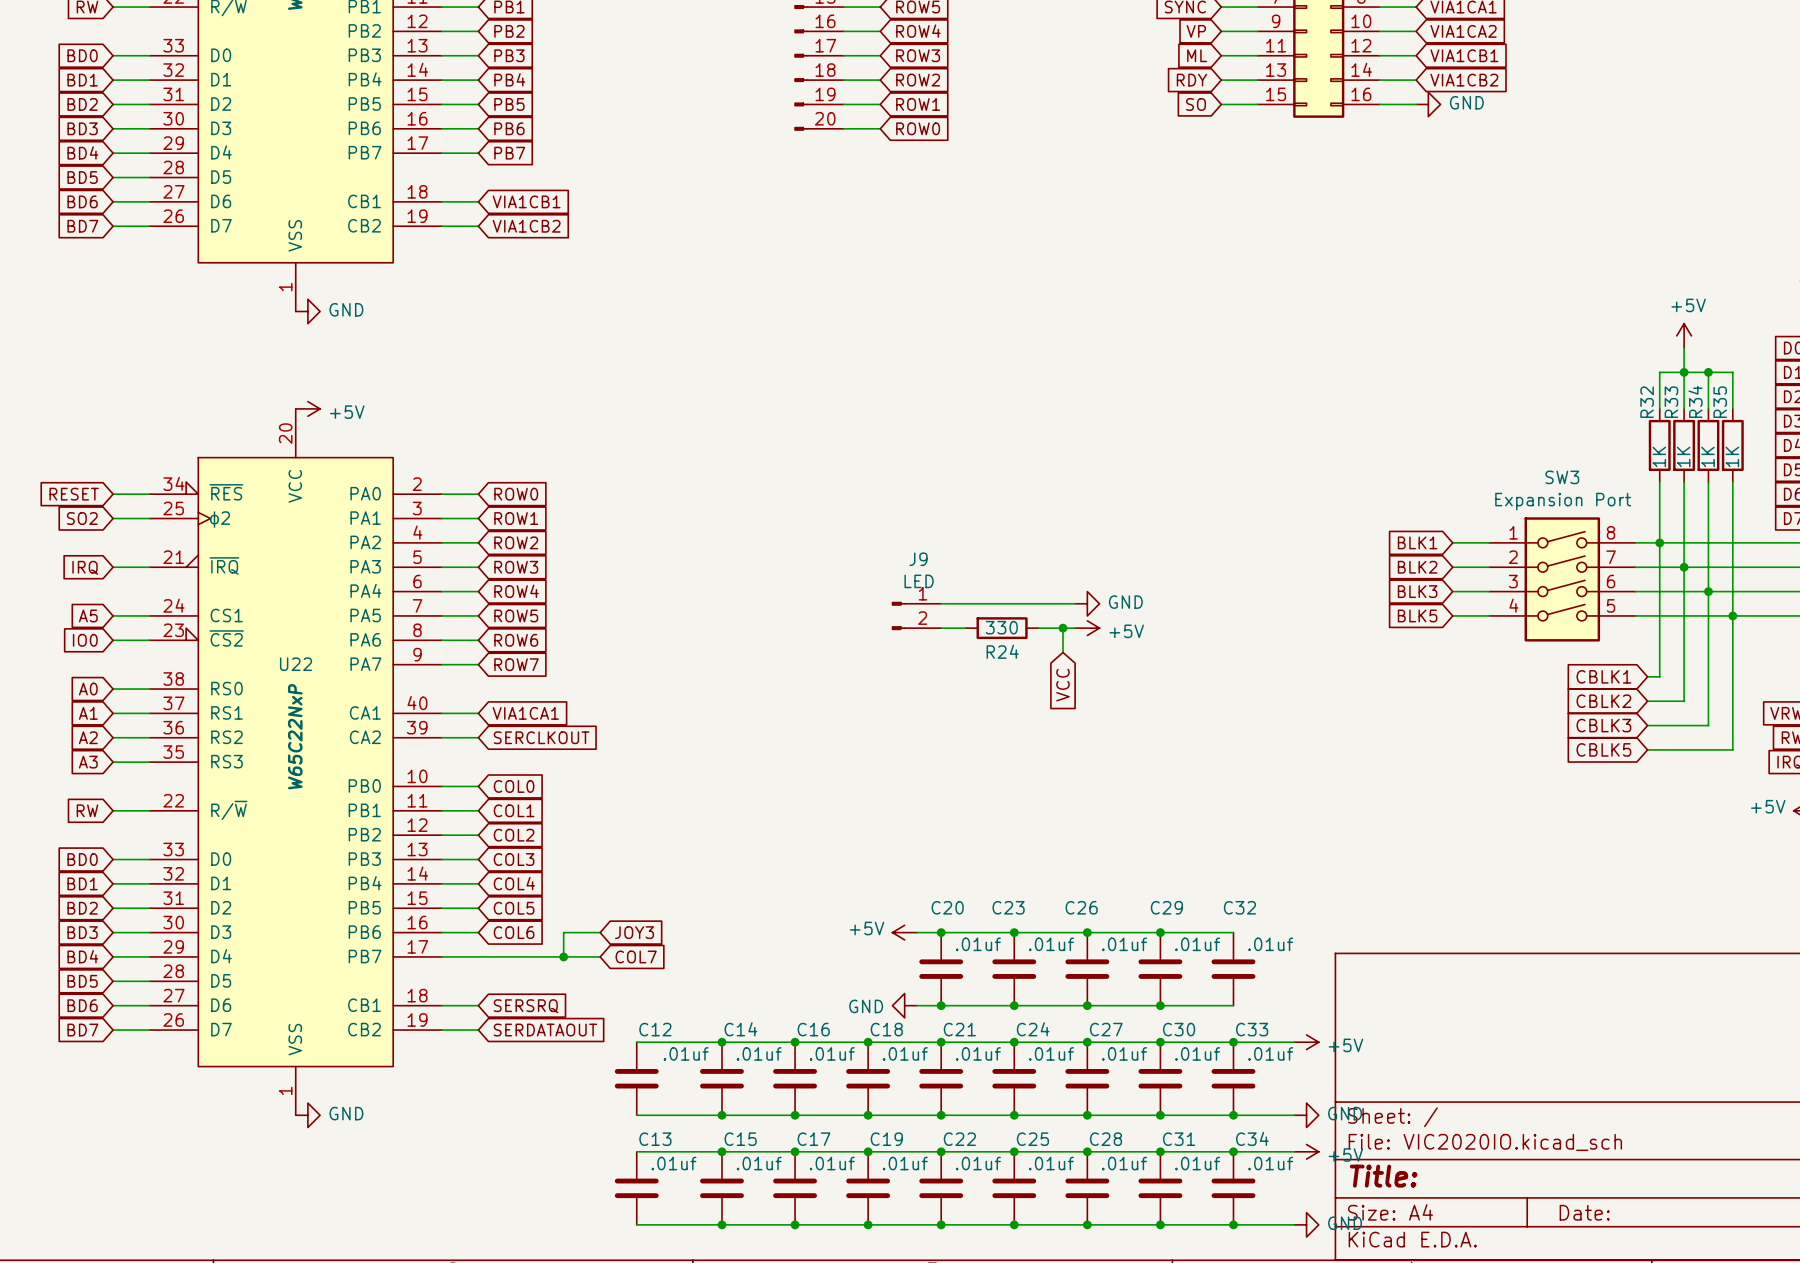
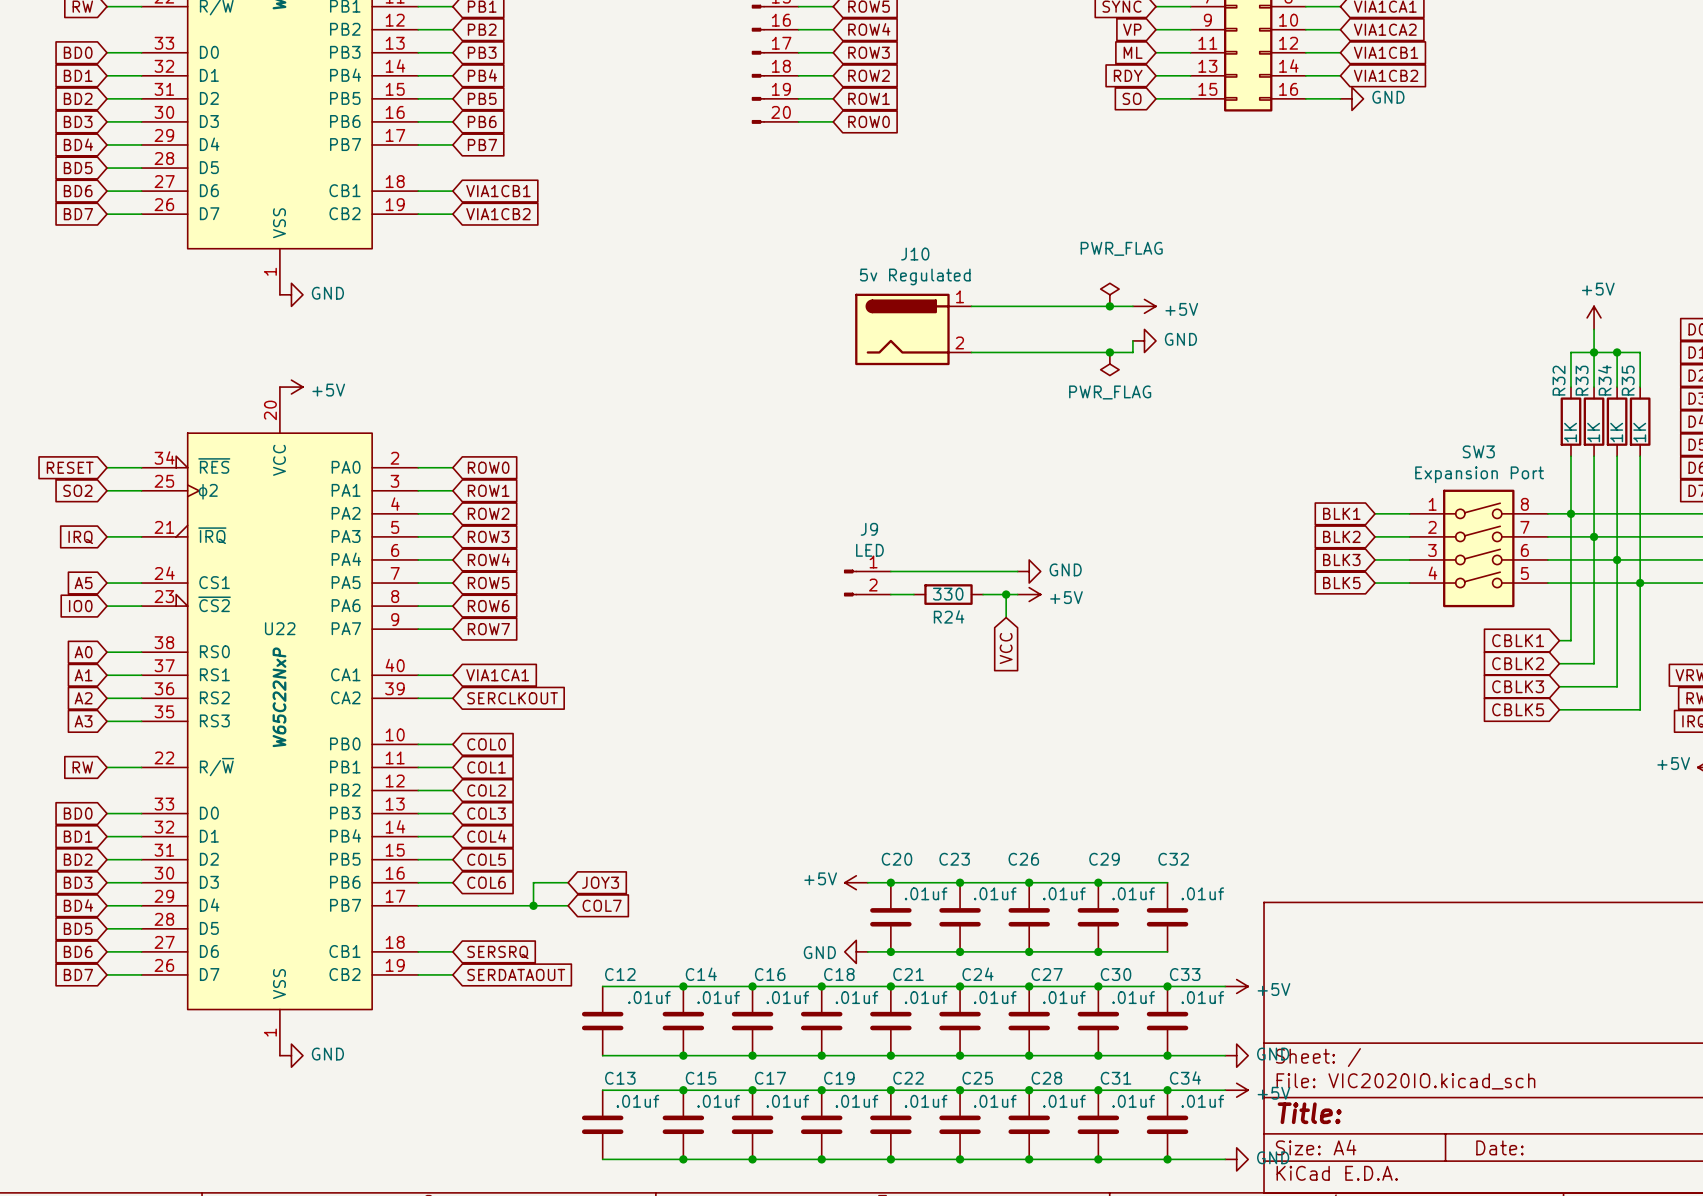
power symbol: none -> PWR_FLAG (1109, 294)
wire: none -> (971, 306) (1132, 306)
junction: none -> (1109, 306)
power symbol: none -> +5V (1144, 306)
J10: none -> 5v Regulated (913, 329)
wire: none -> (1132, 340) (1132, 352) (971, 352)
power symbol: none -> GND (1144, 340)
junction: none -> (1109, 352)
power symbol: none -> PWR_FLAG (1109, 364)

